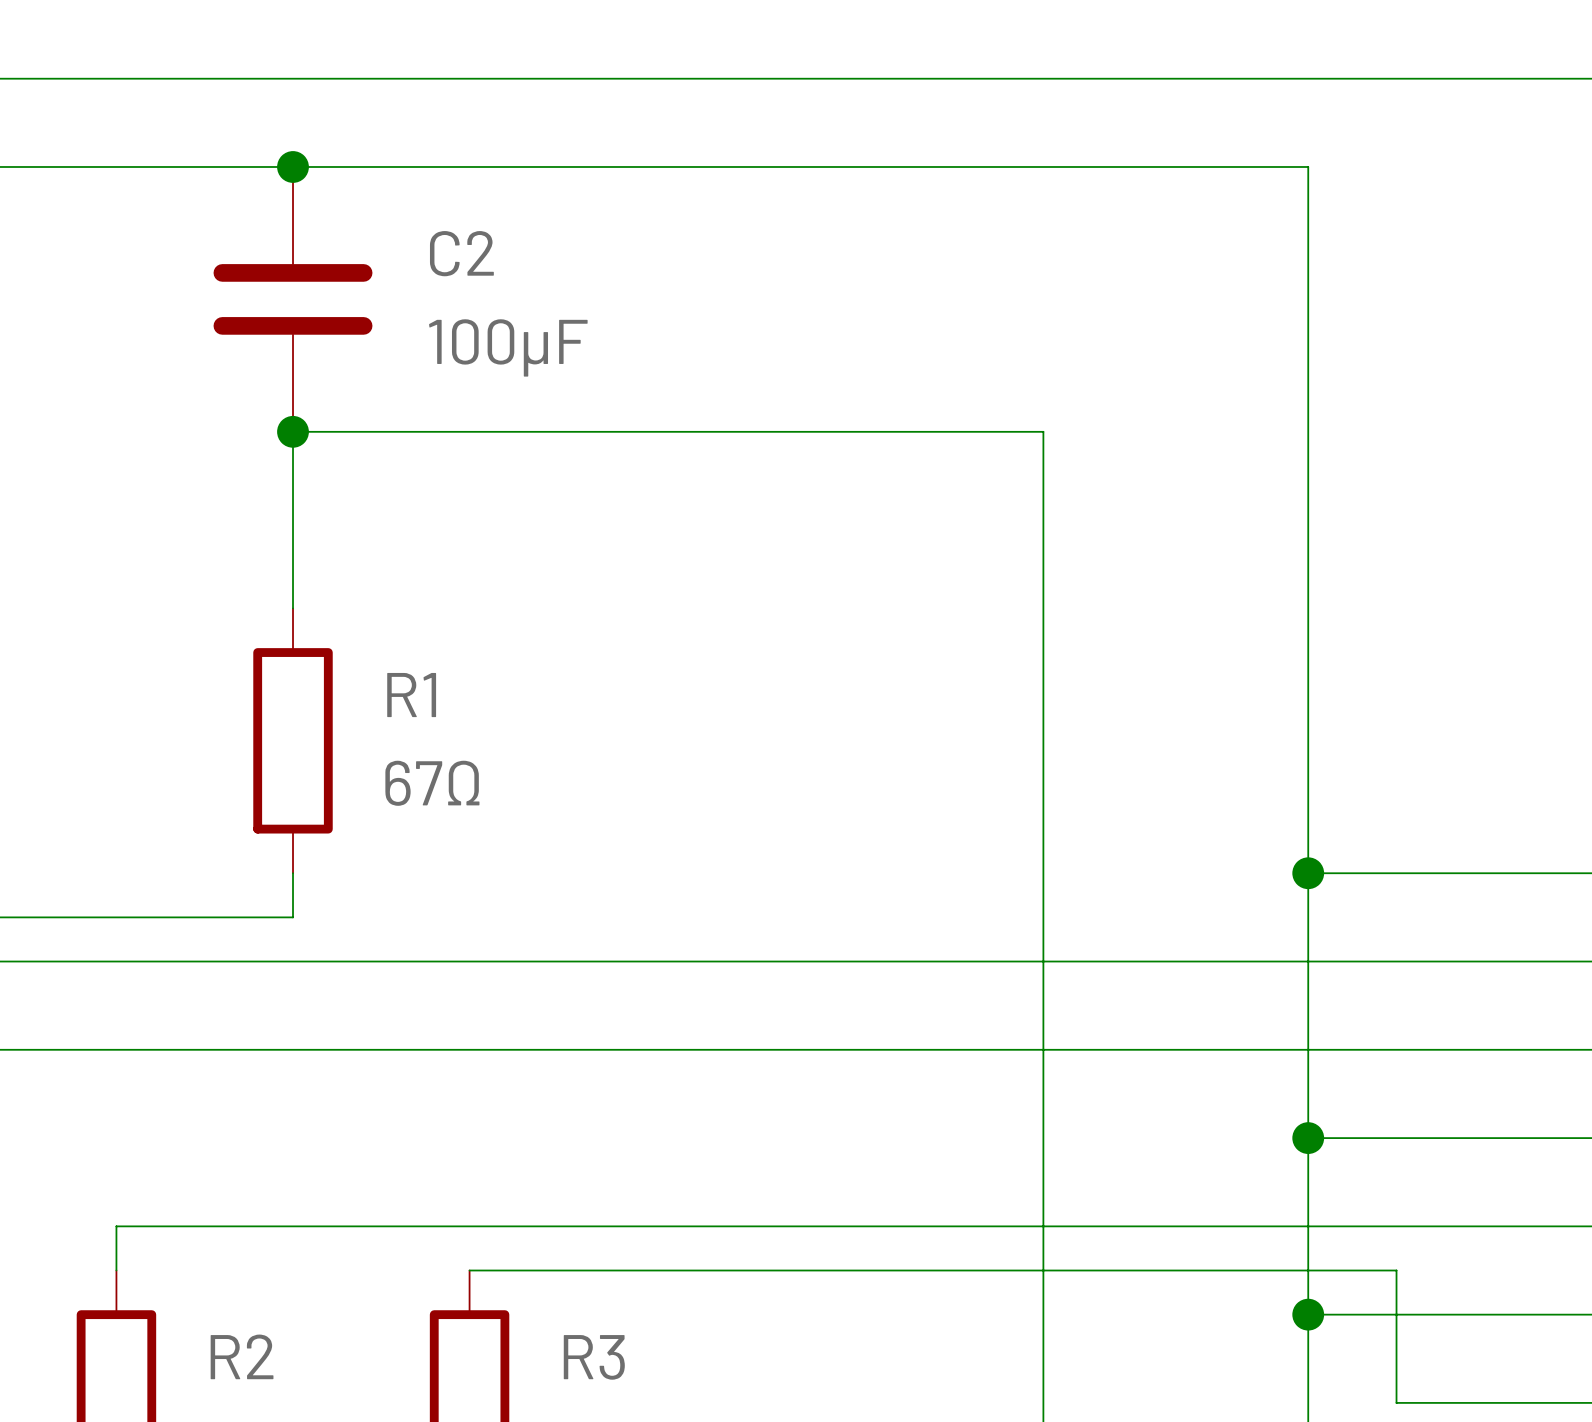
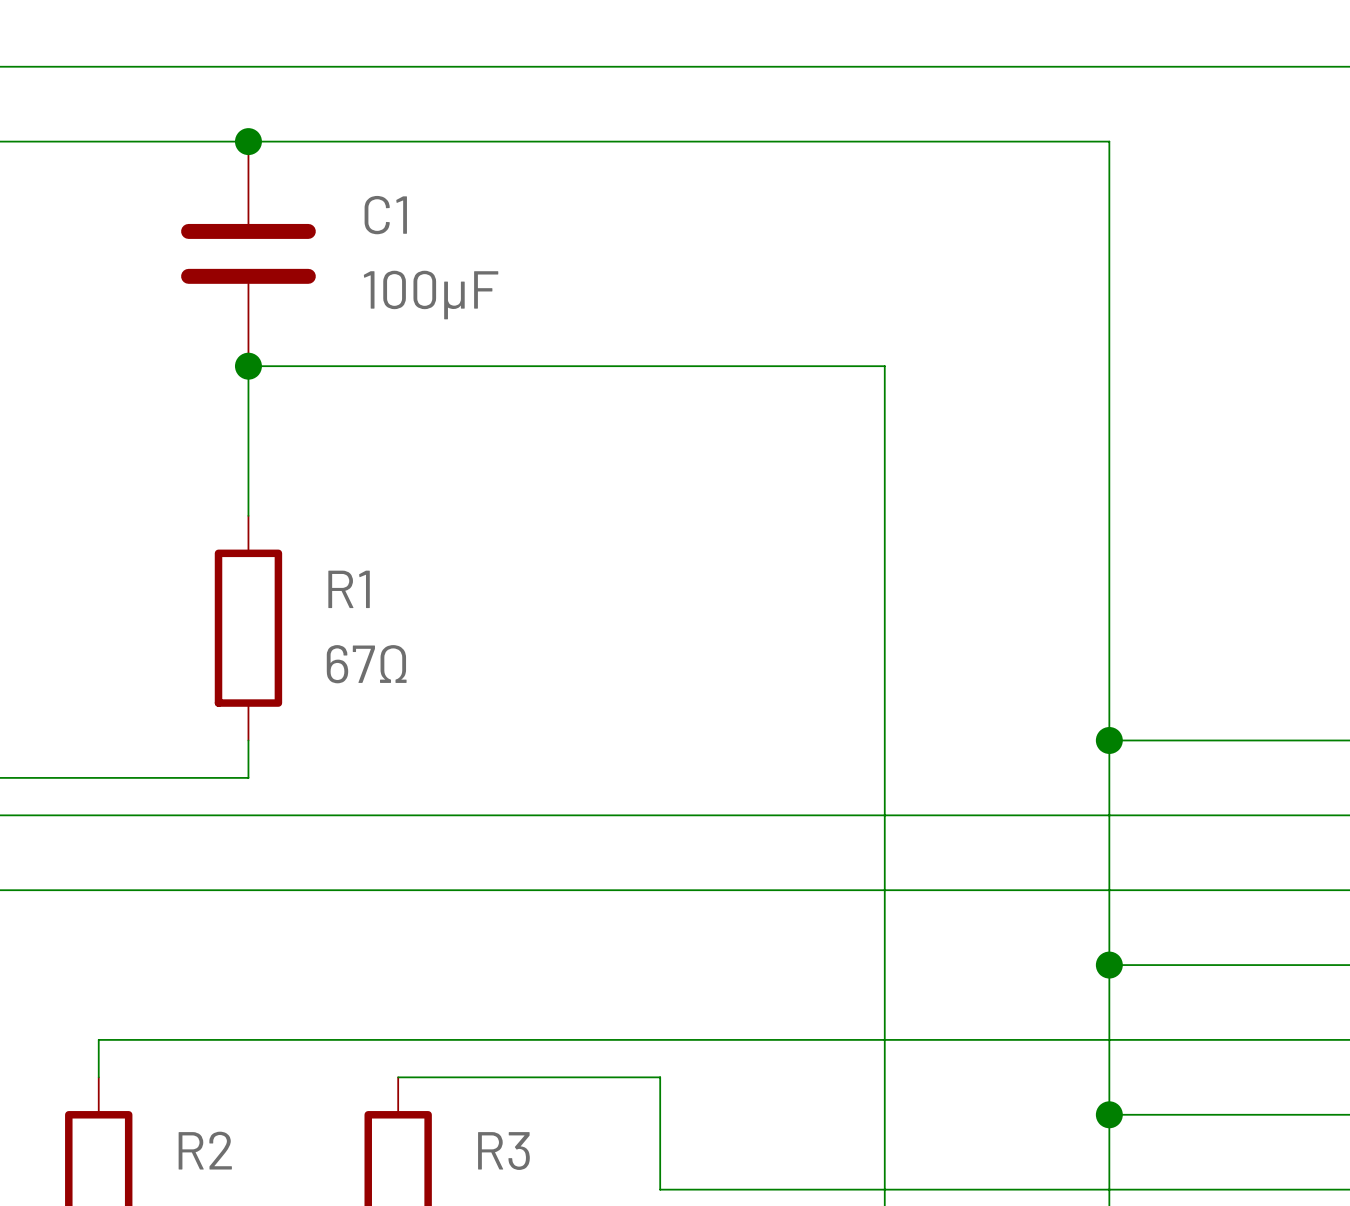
C2 name: C2 (461, 253) -> C1 (385, 215)
wire: (778, 1270) (1396, 1270) (1396, 1402) -> (660, 1077) (660, 1189) (1184, 1189)

